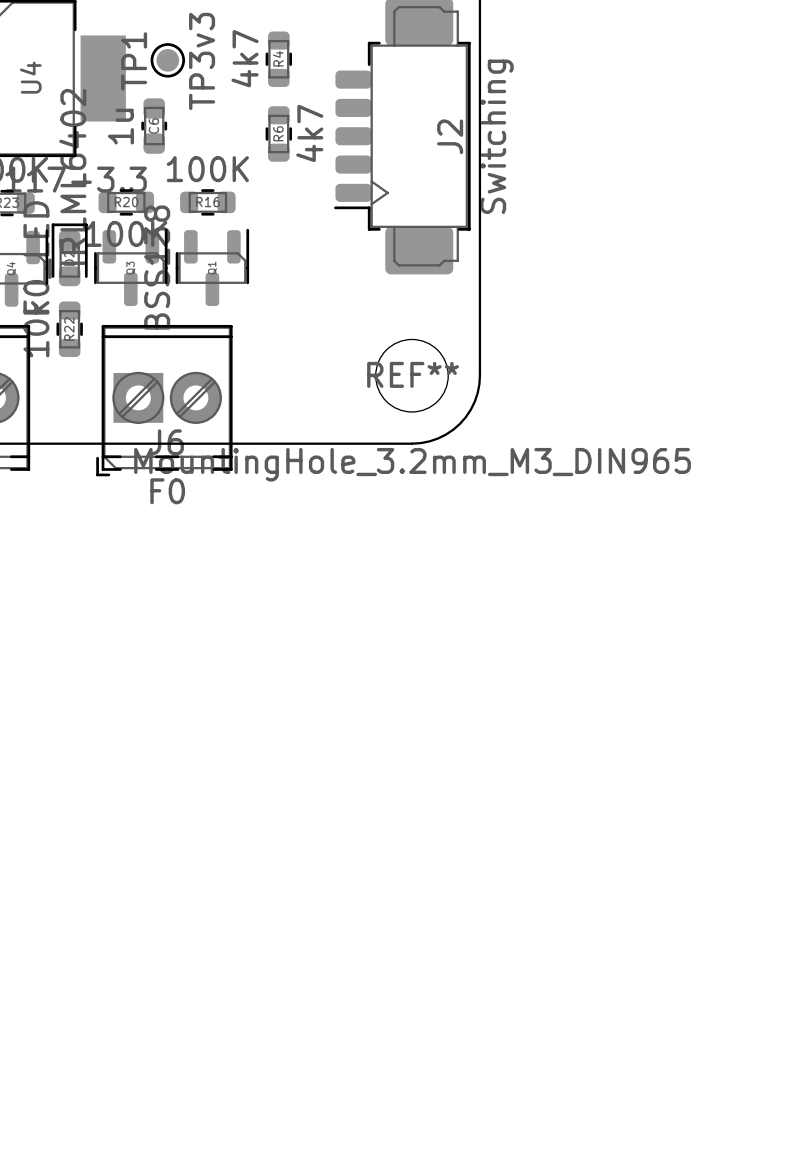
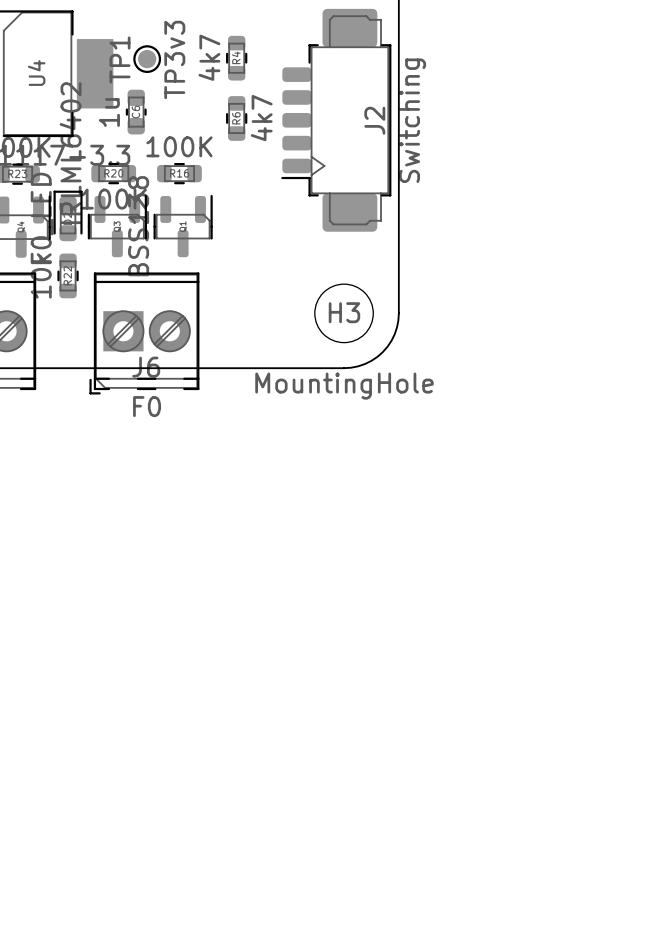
REF** name: REF** (413, 374) -> H3 (344, 312)
REF** value: MountingHole_3.2mm_M3_DIN965 (412, 464) -> MountingHole (344, 386)

